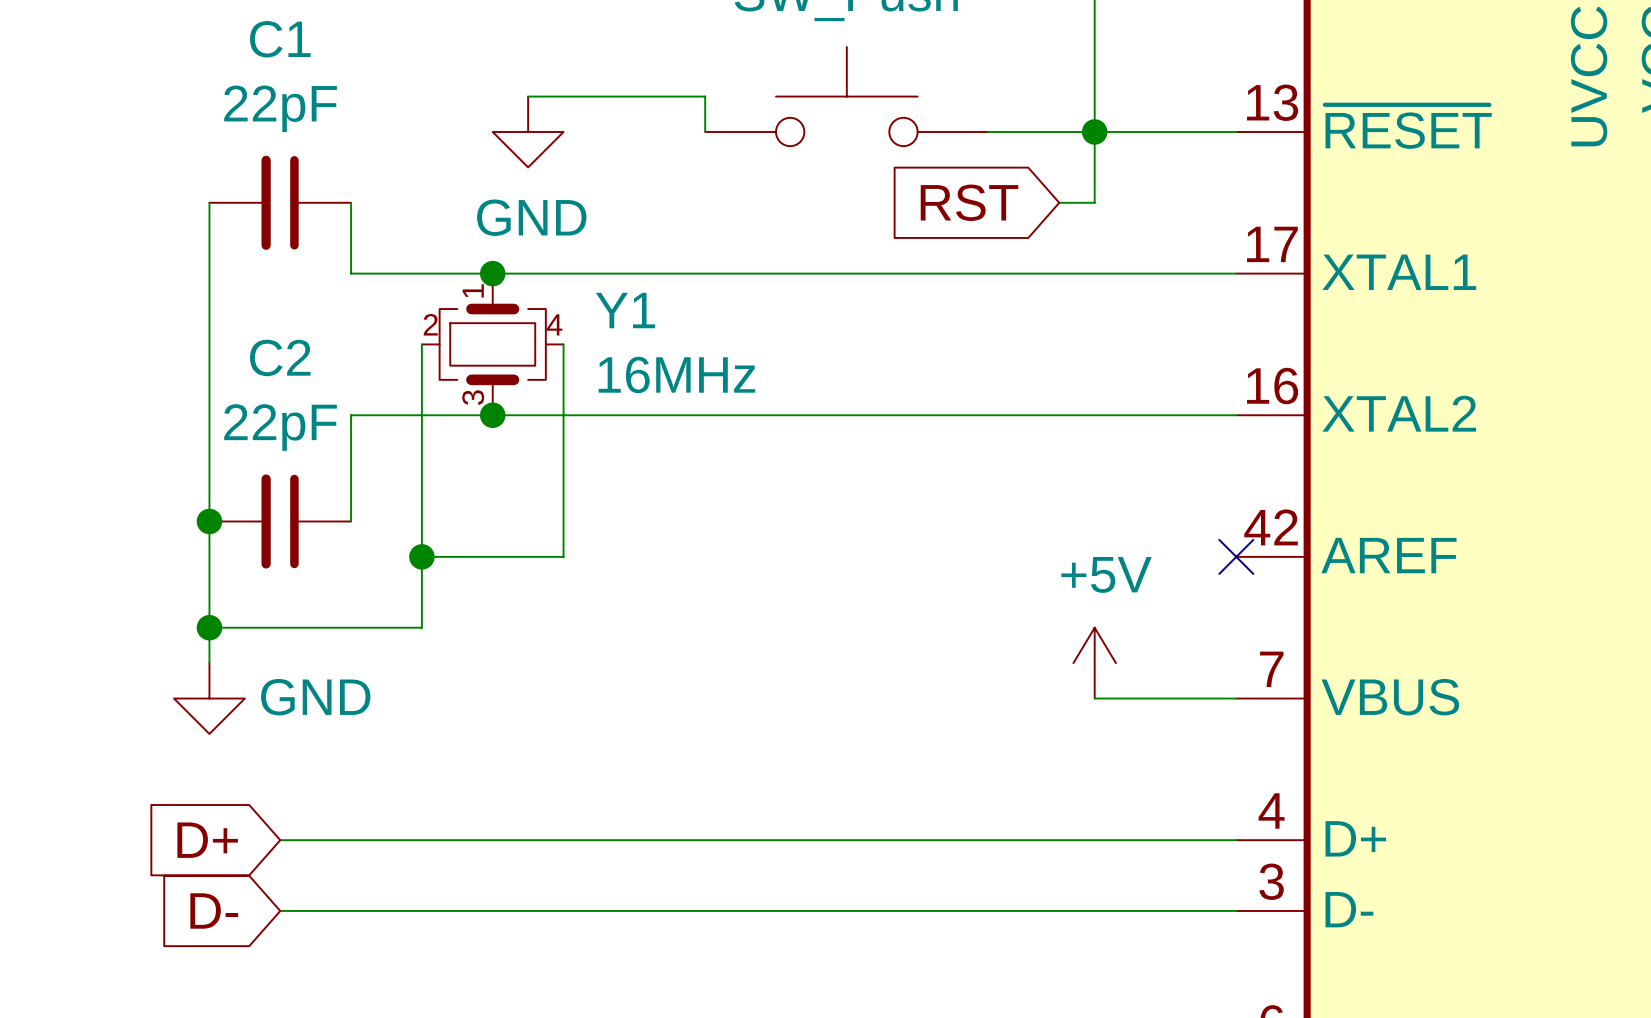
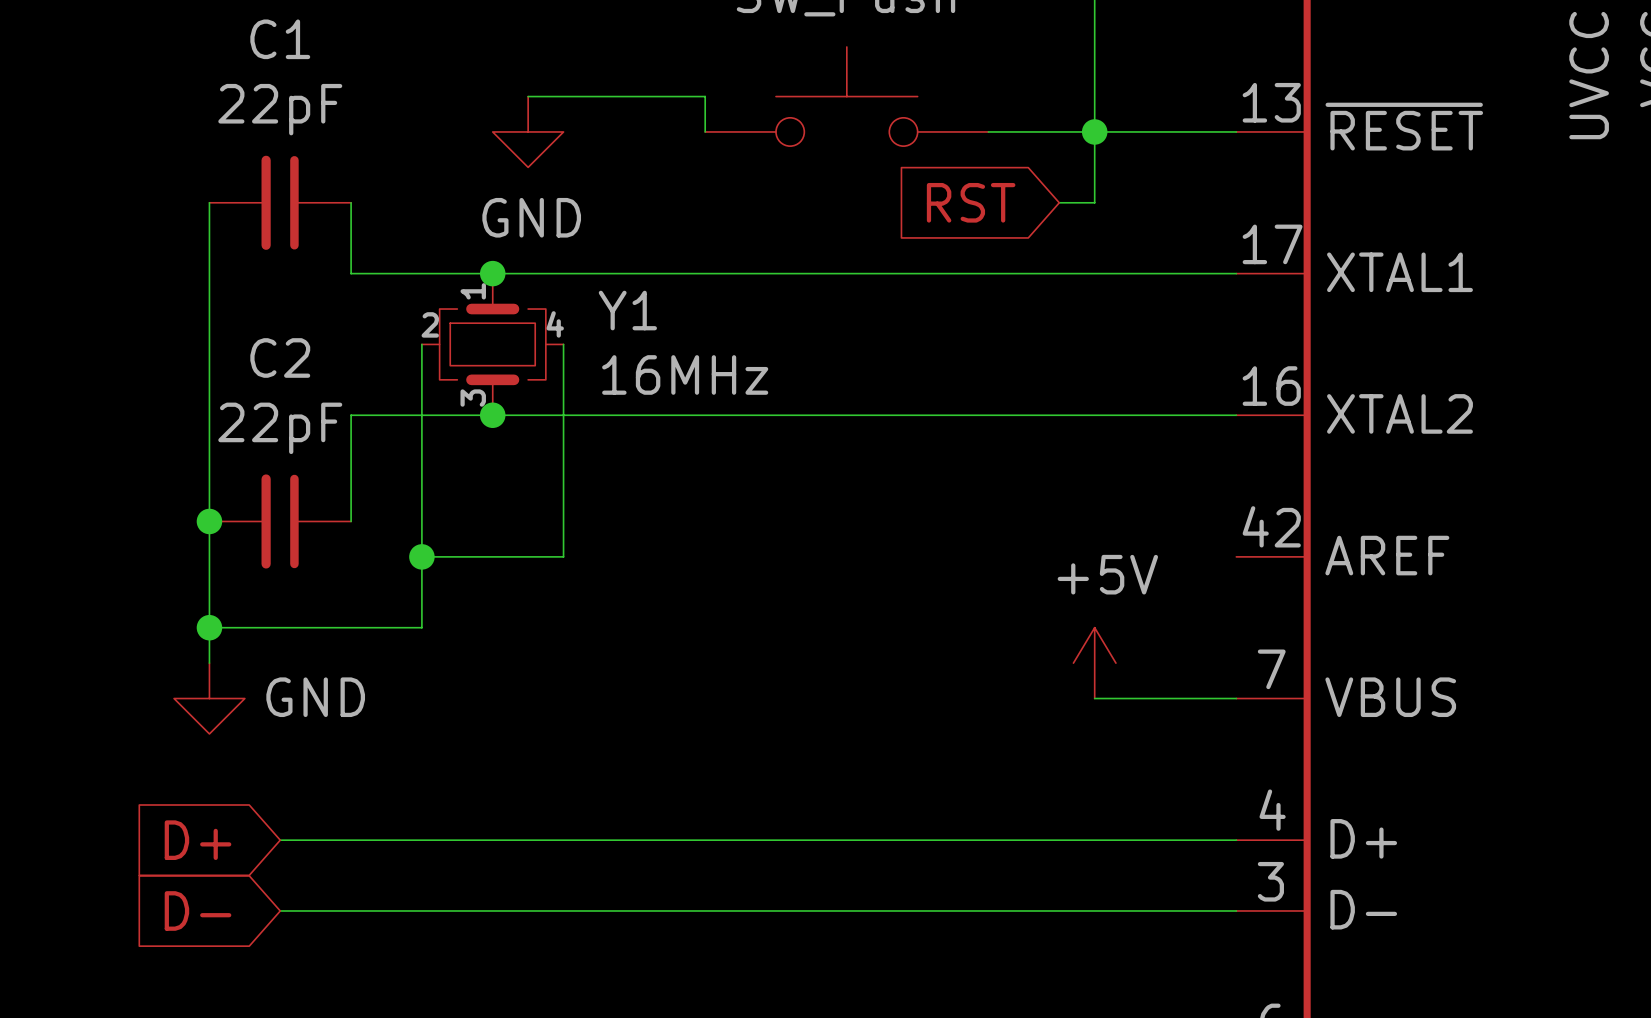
no-connect mark: (1236, 556) -> none

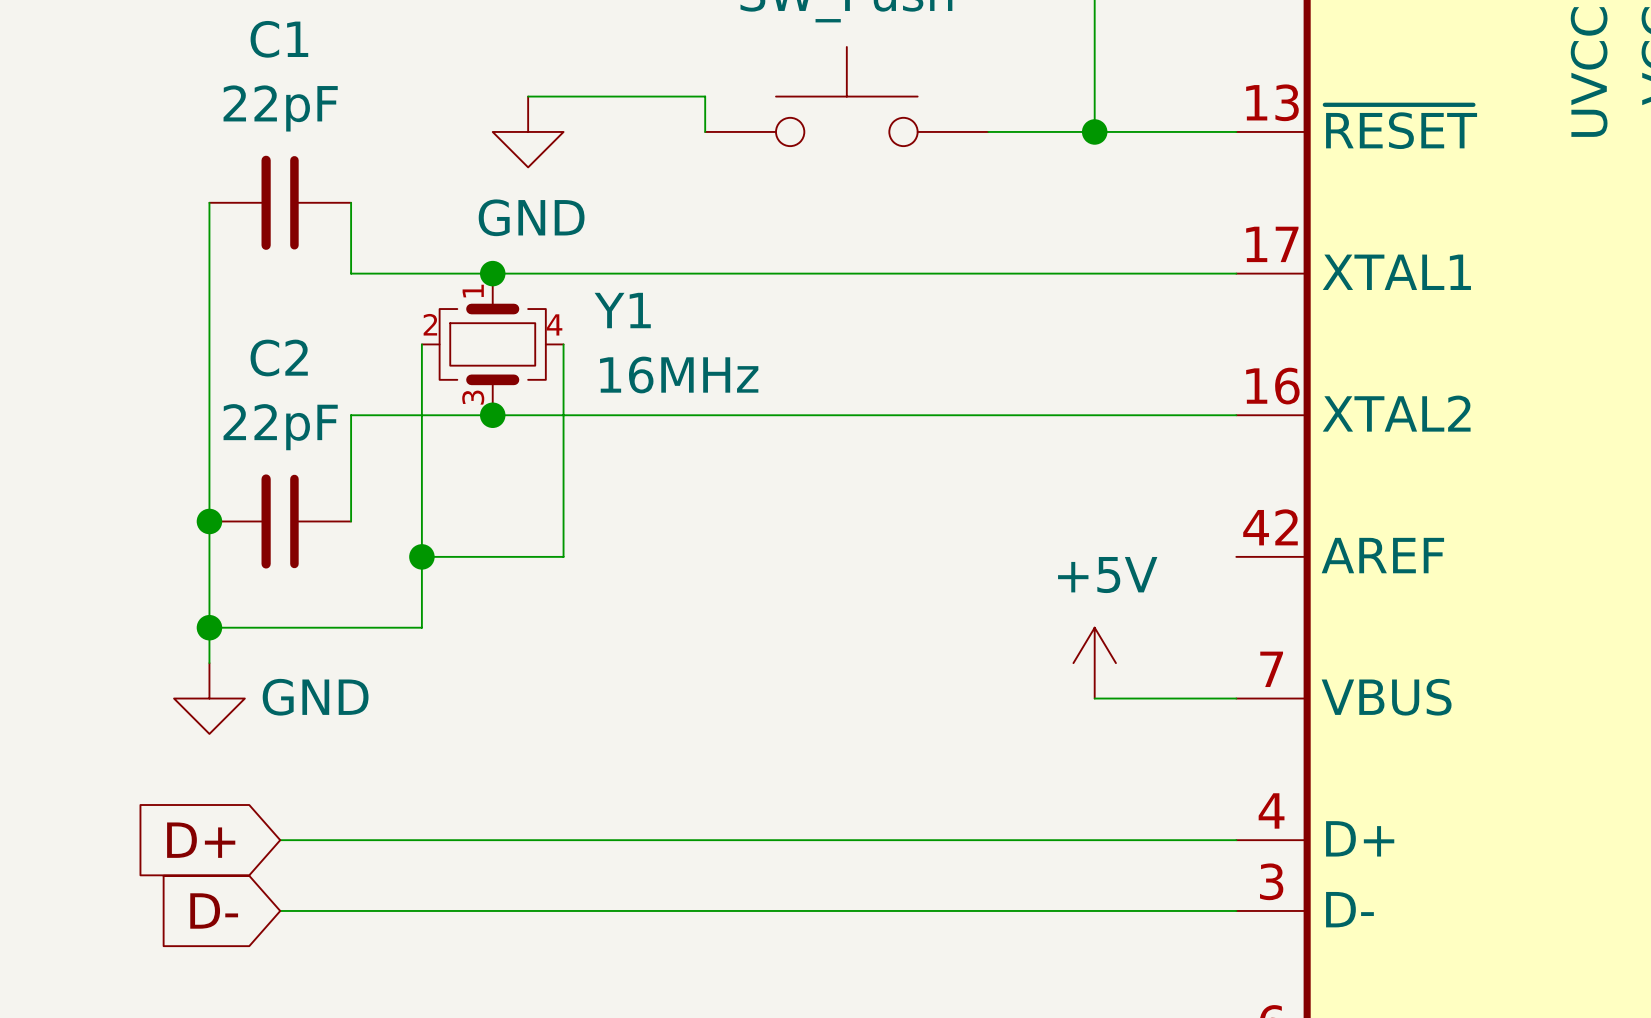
wire: (1094, 131) (1094, 202) (1059, 202) -> none
global label: RST (971, 202) -> none

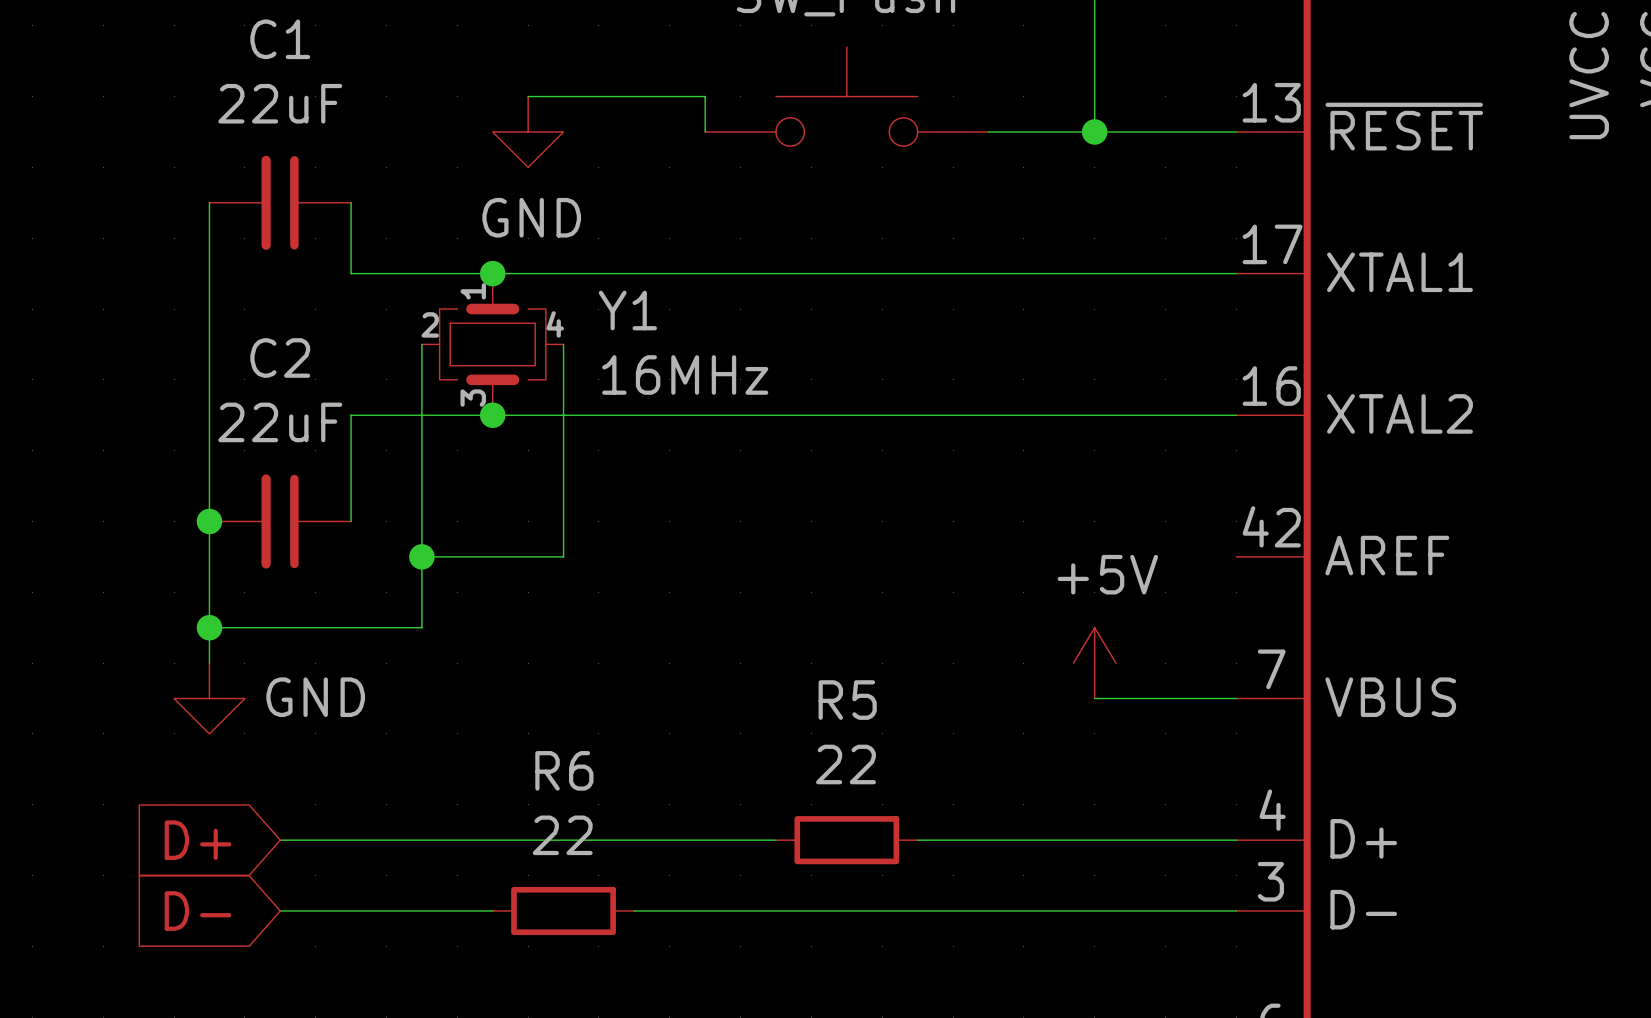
C1 value: 22pF (280, 108) -> 22uF (280, 103)
C2 value: 22pF (280, 427) -> 22uF (280, 422)
wire: (776, 840) (917, 840) -> none
R5: none -> 22 (846, 840)
wire: (492, 910) (634, 910) -> none
R6: none -> 22 (563, 910)

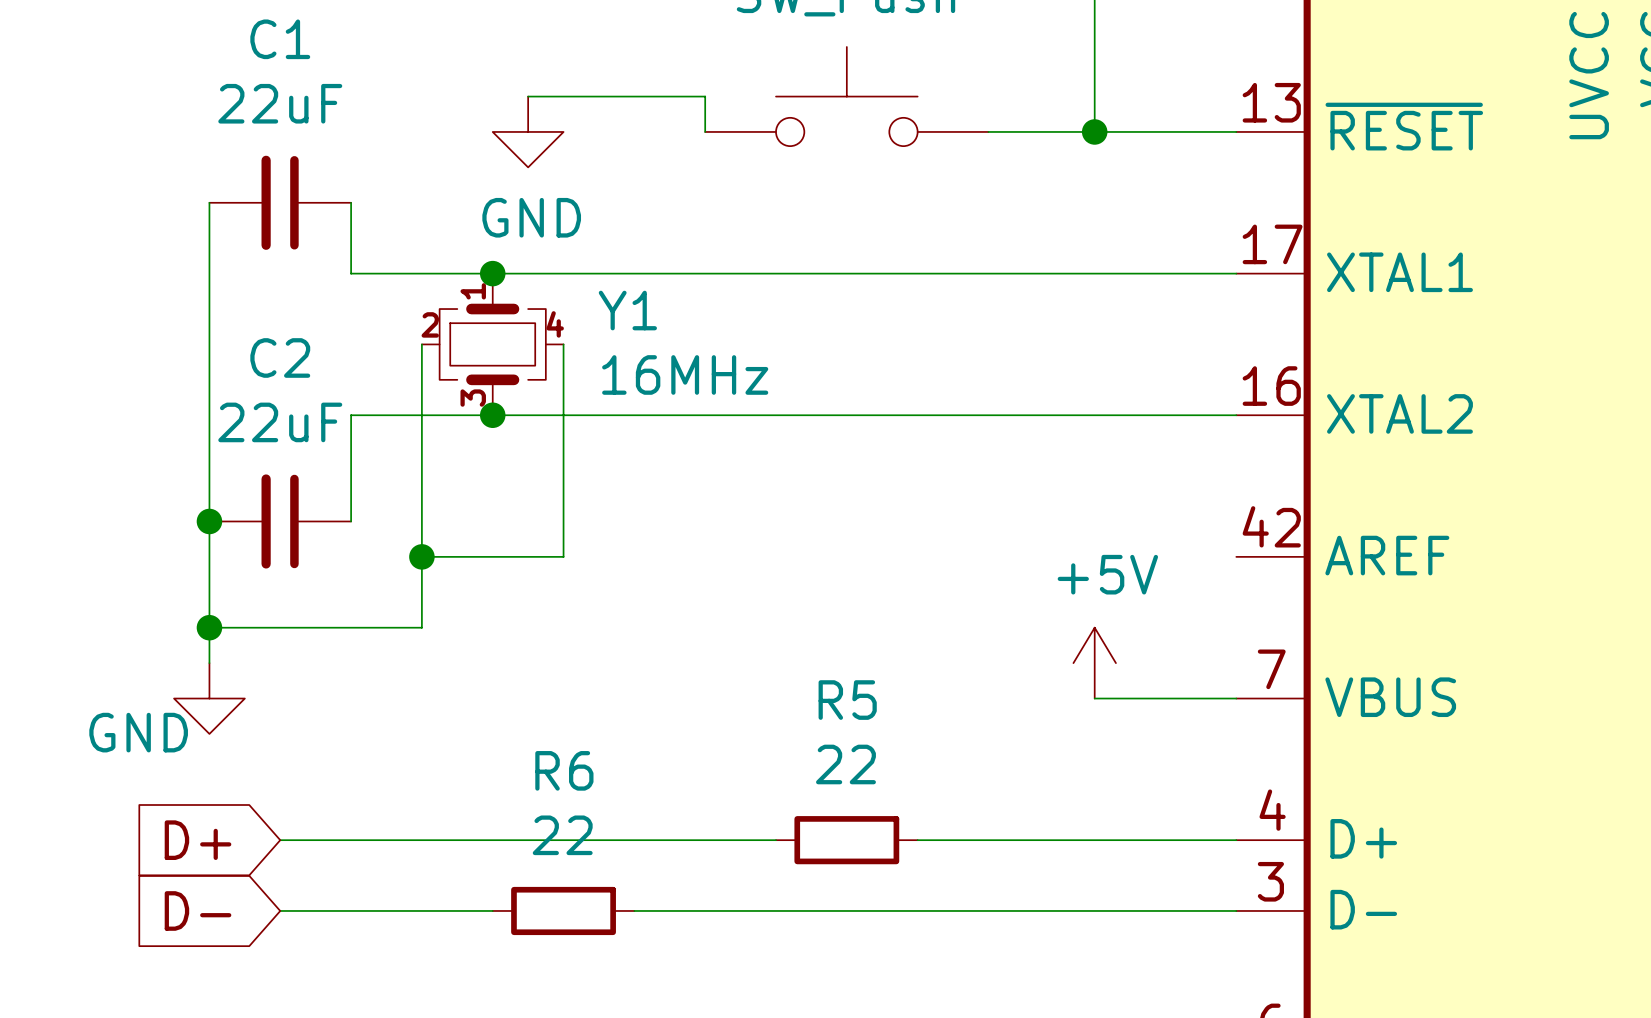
power symbol text position: GND (315, 697) -> GND (138, 732)

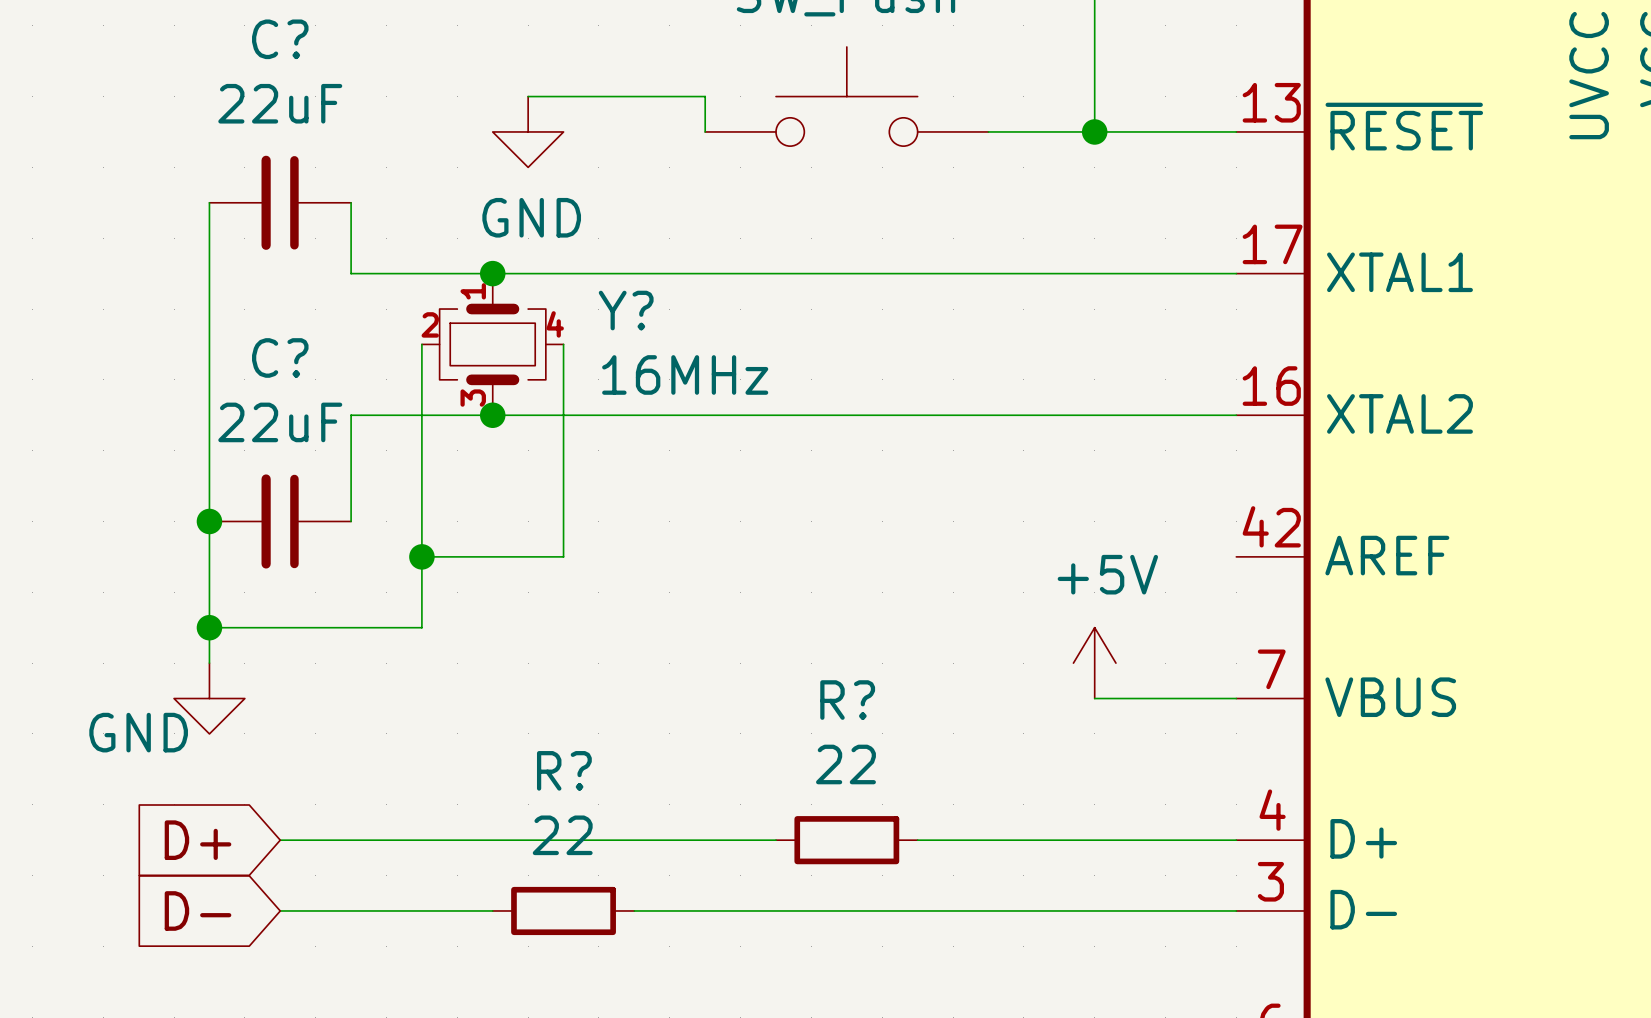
C1 name: C1 (280, 39) -> C? (280, 39)
Y1 name: Y1 (627, 310) -> Y? (626, 310)
C2 name: C2 (280, 357) -> C? (280, 357)
R5 name: R5 (847, 700) -> R? (847, 700)
R6 name: R6 (564, 770) -> R? (564, 770)

